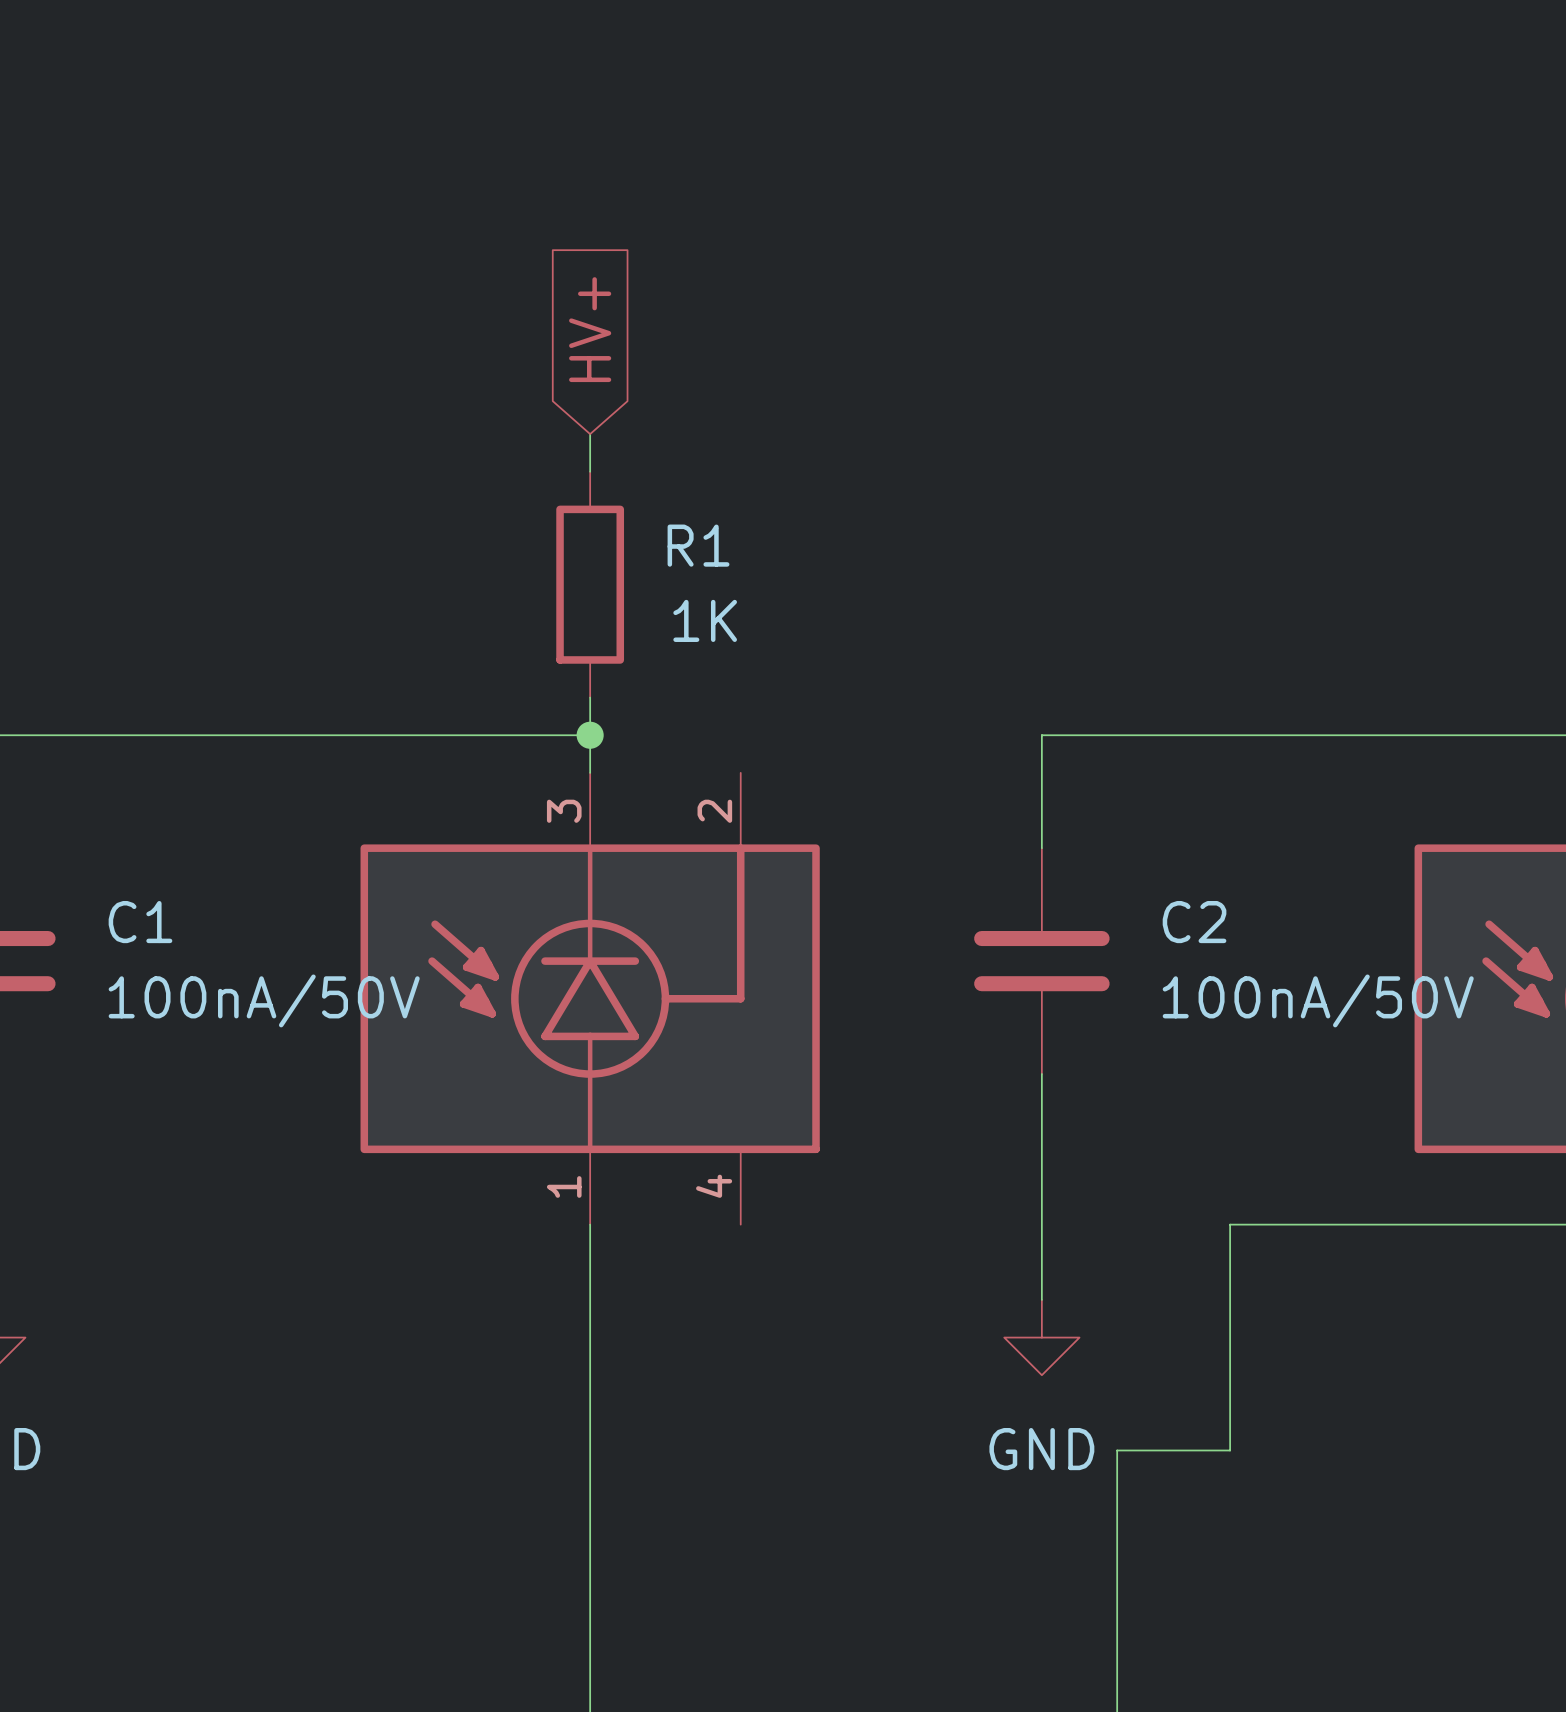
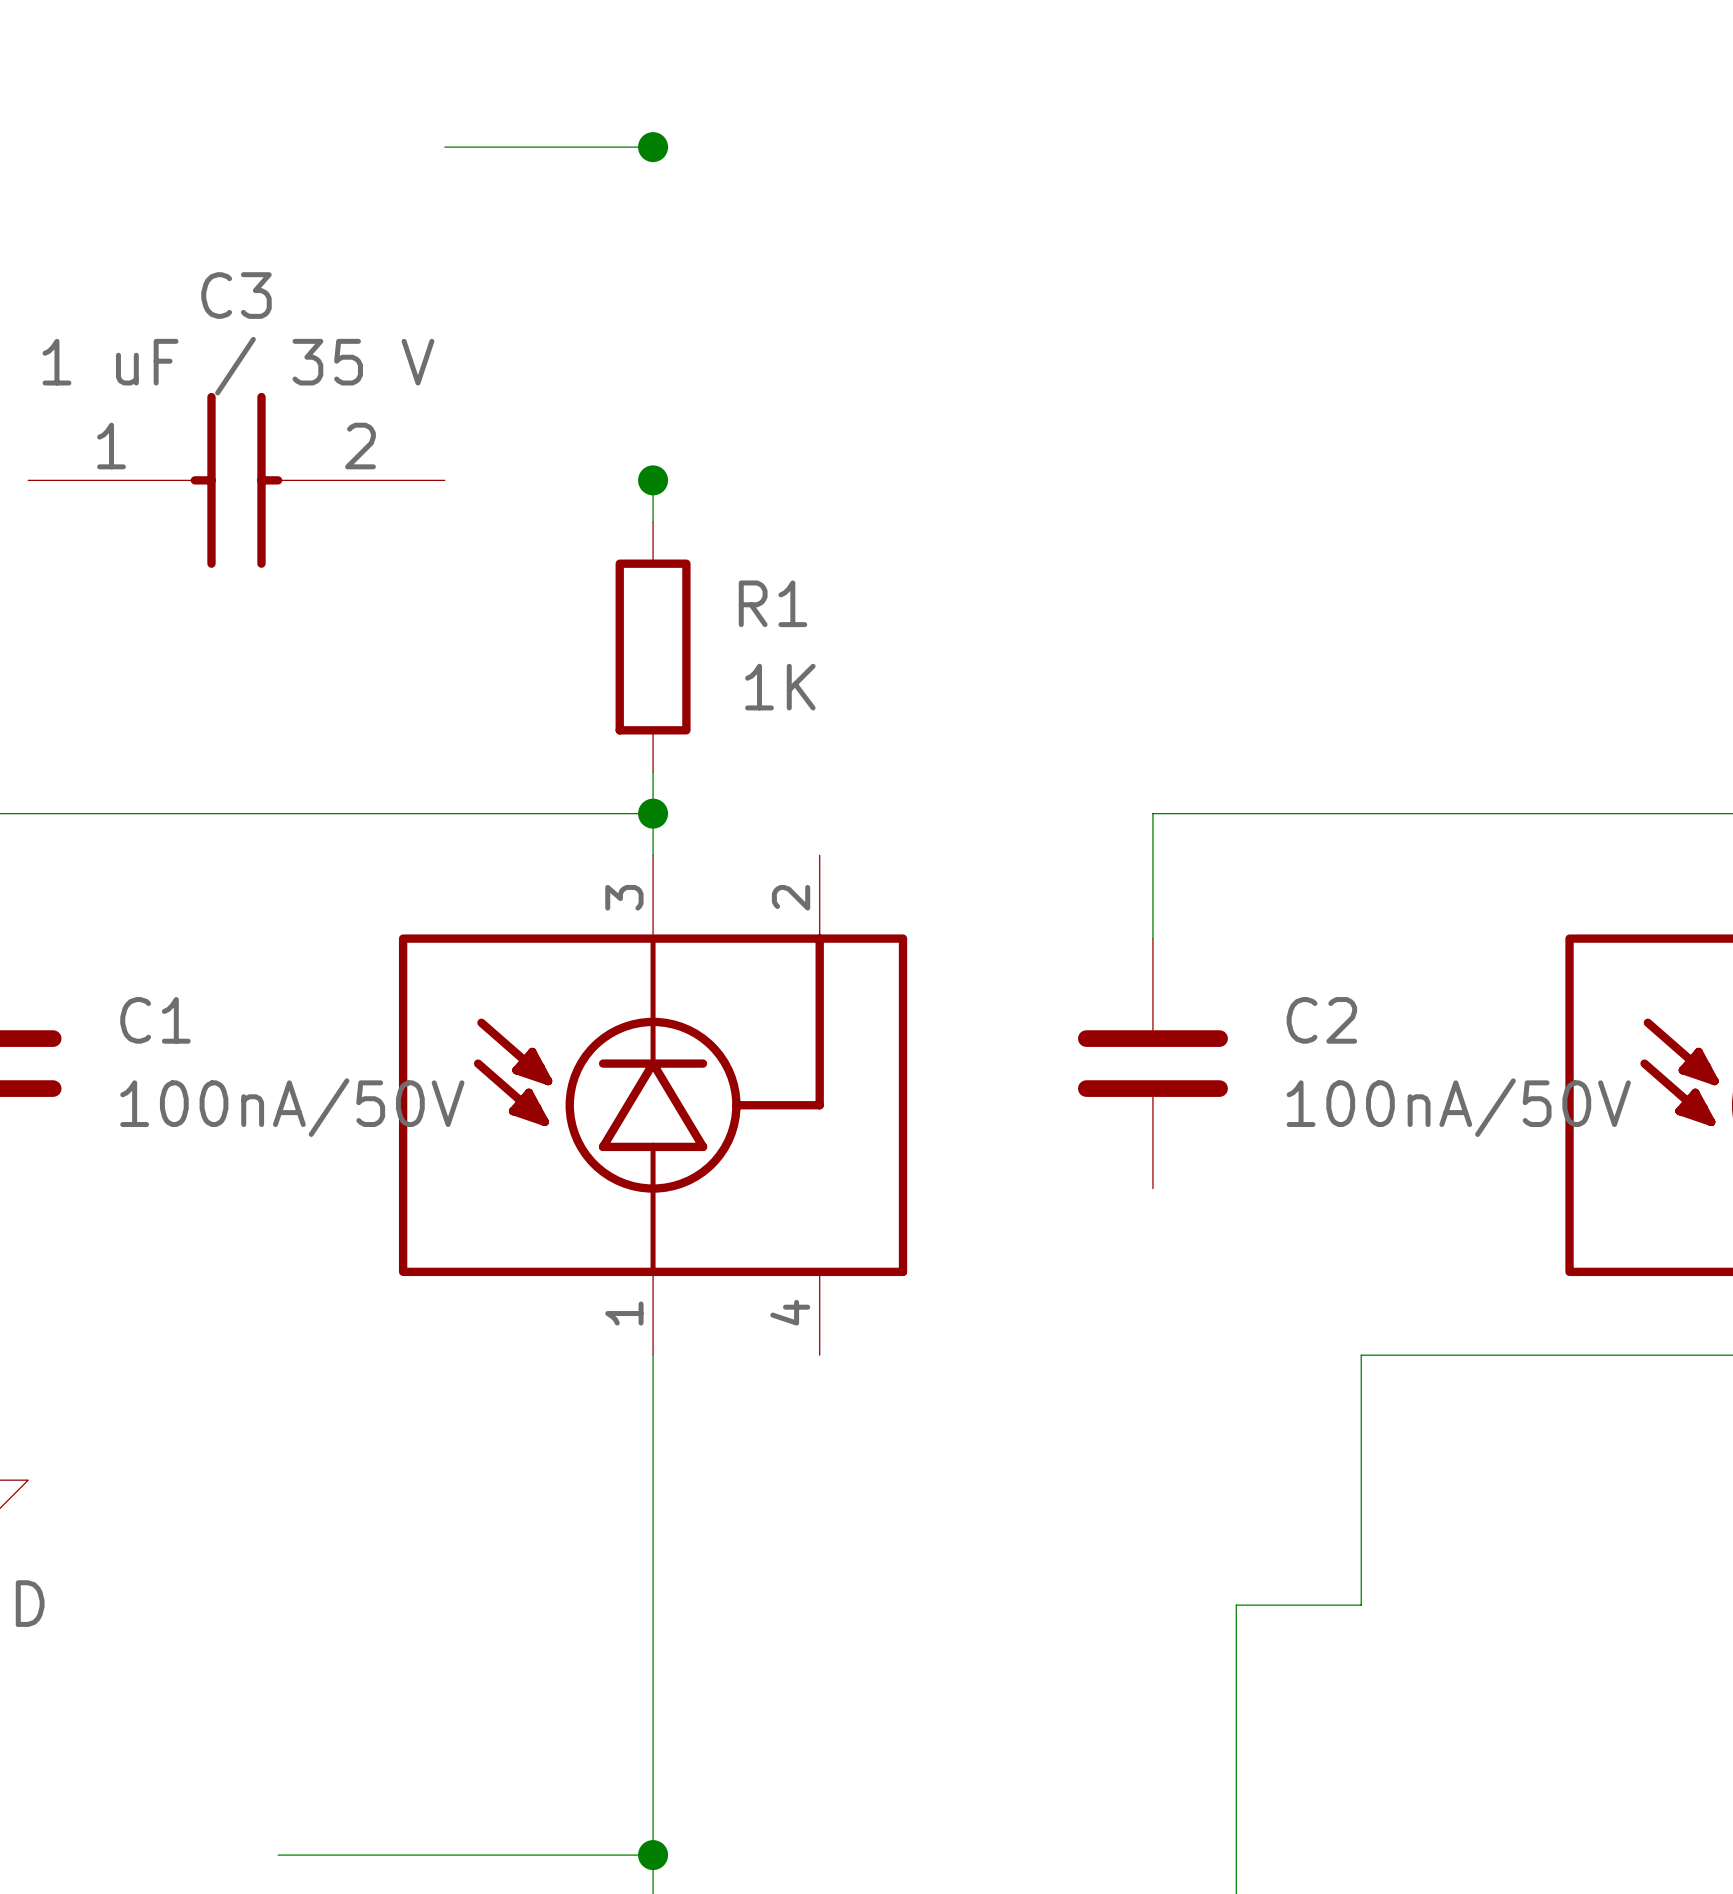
wire: none -> (444, 147) (653, 147)
junction: none -> (653, 147)
global label: HV+ (590, 329) -> none
C3: none -> 1 uF / 35 V (236, 480)
junction: none -> (653, 480)
wire: (1041, 1074) (1041, 1299) -> none
power symbol: GND (1041, 1337) -> none
wire: none -> (278, 1855) (653, 1855)
junction: none -> (653, 1855)

